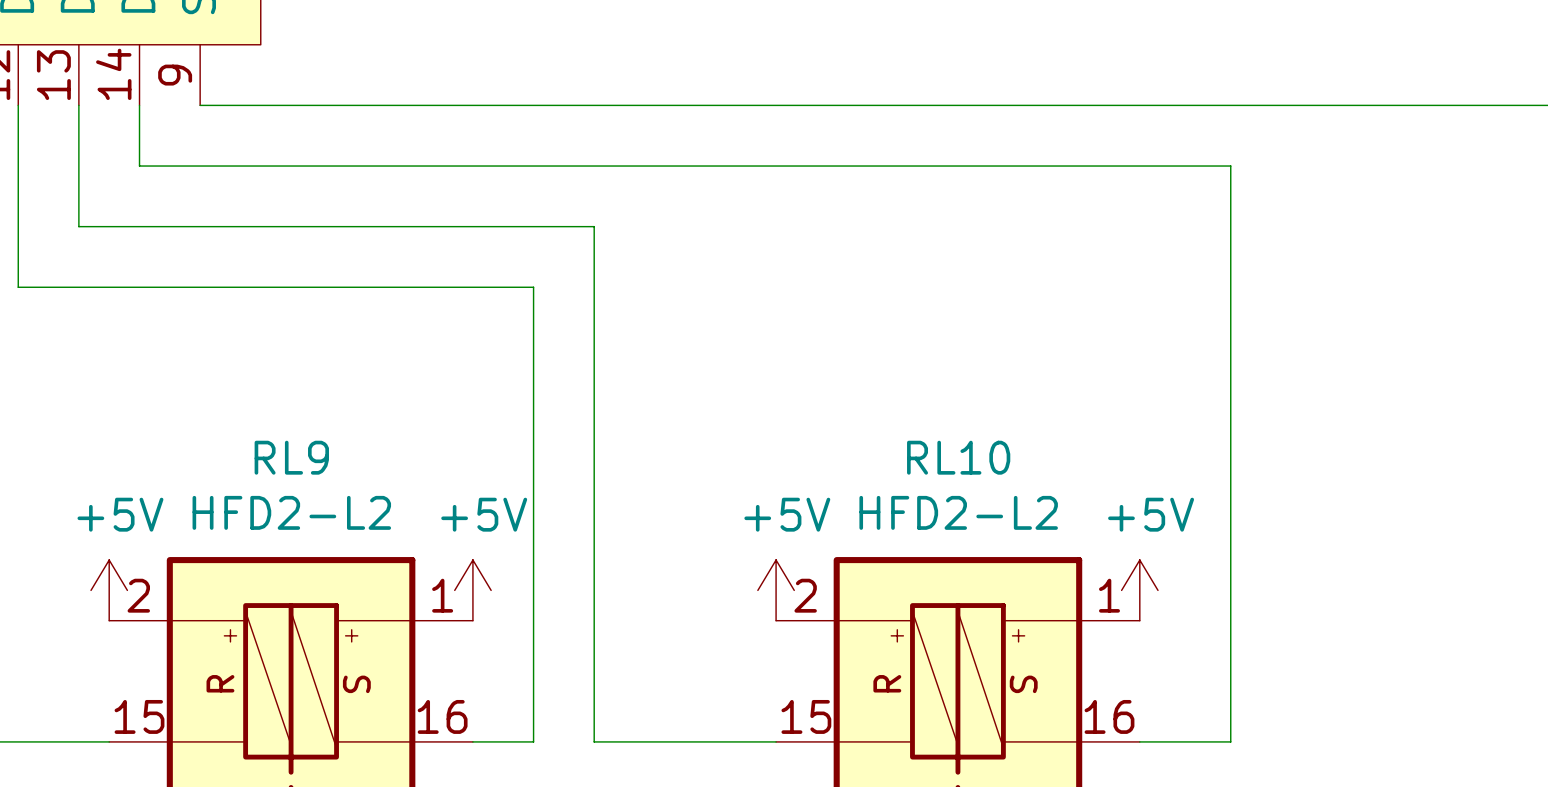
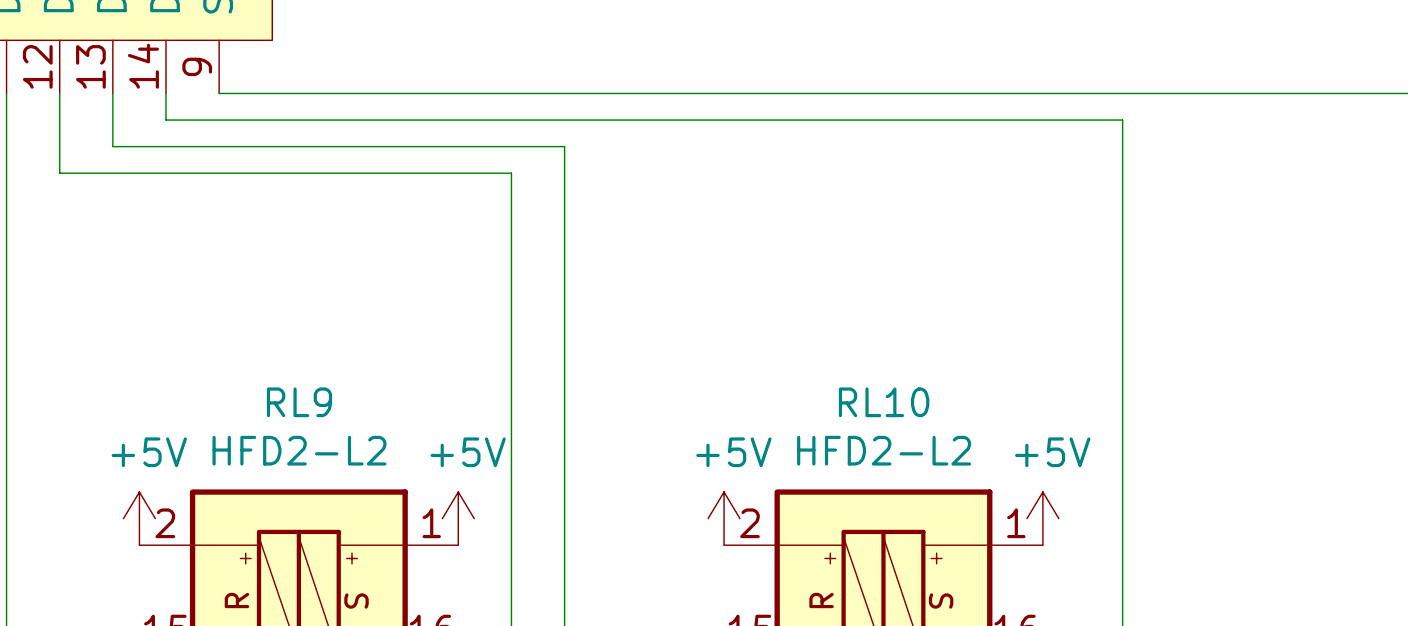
wire: (139, 135) (139, 166) -> (112, 146) (165, 146)
wire: (78, 166) (78, 226) (594, 226) -> (564, 146) (564, 199)
wire: (594, 166) (1230, 166) -> (165, 120) (1122, 120) (1122, 146)
wire: (18, 196) (18, 287) (533, 287) -> (59, 173) (511, 173) (511, 252)

